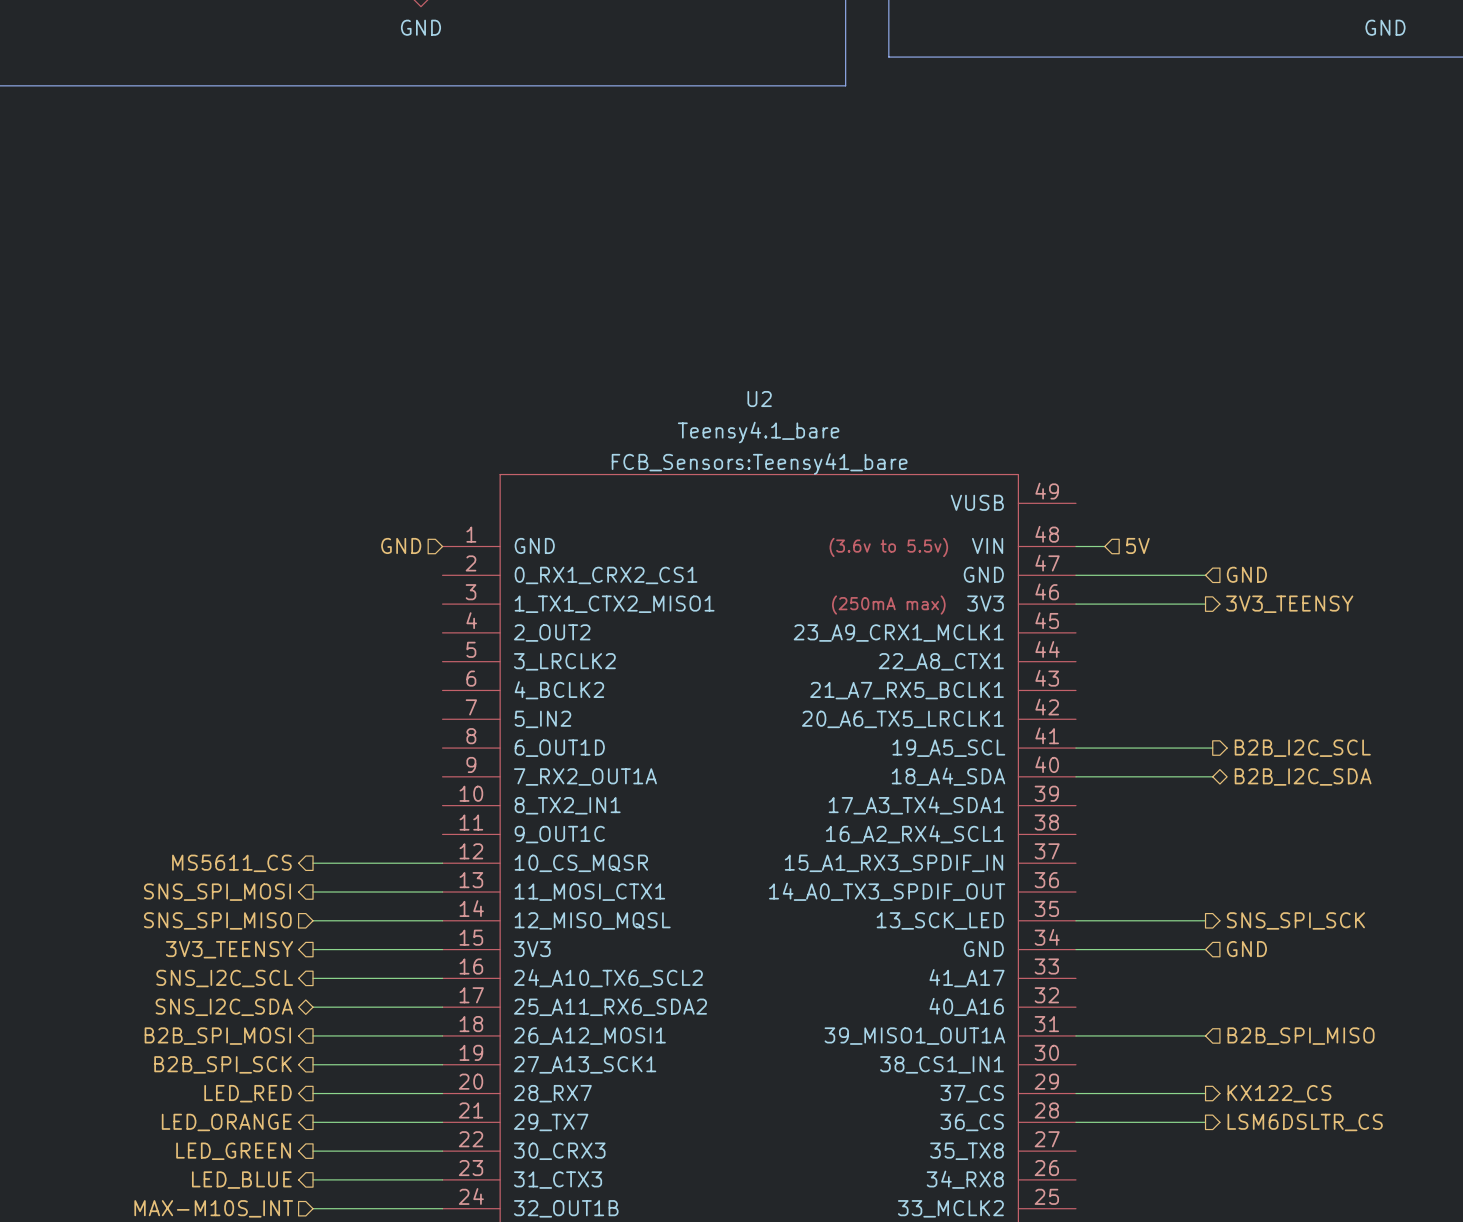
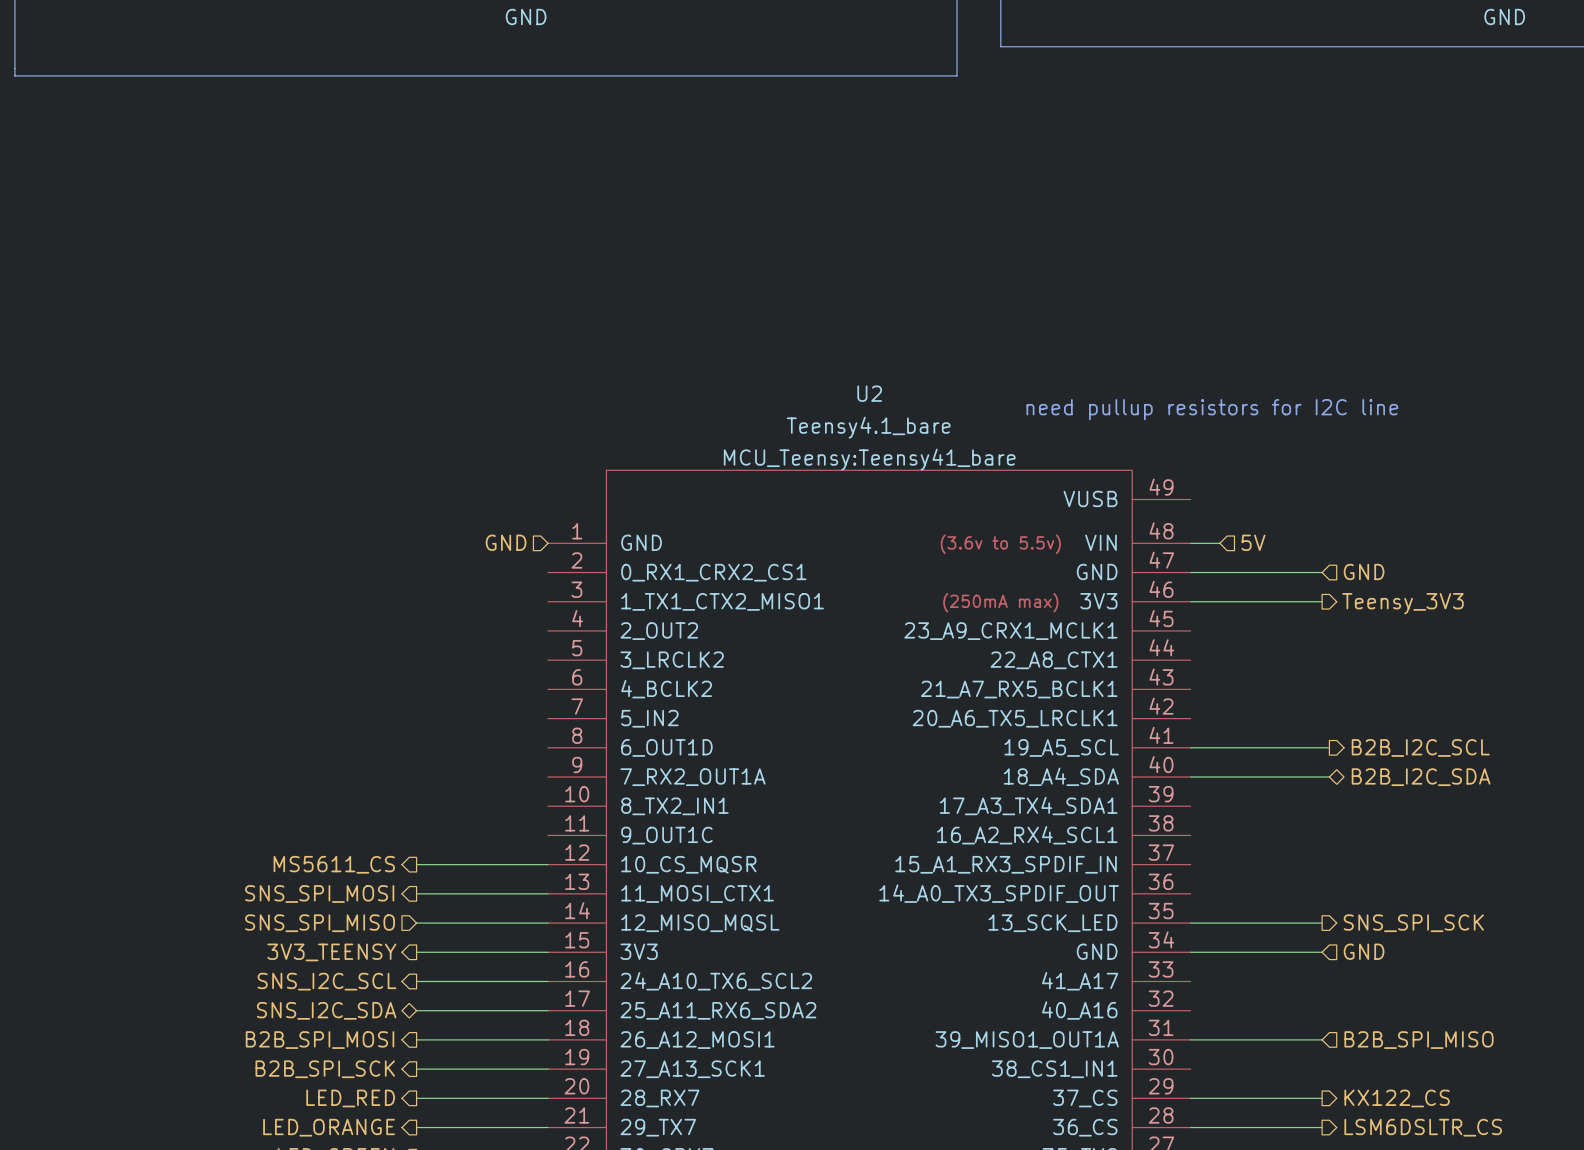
text: none -> need pullup resistors for I2C line (1212, 409)
U2 text: FCB_Sensors:Teensy41_bare (759, 463) -> MCU_Teensy:Teensy41_bare (869, 459)
hierarchical label: 3V3_TEENSY (1289, 604) -> Teensy_3V3 (1403, 603)

